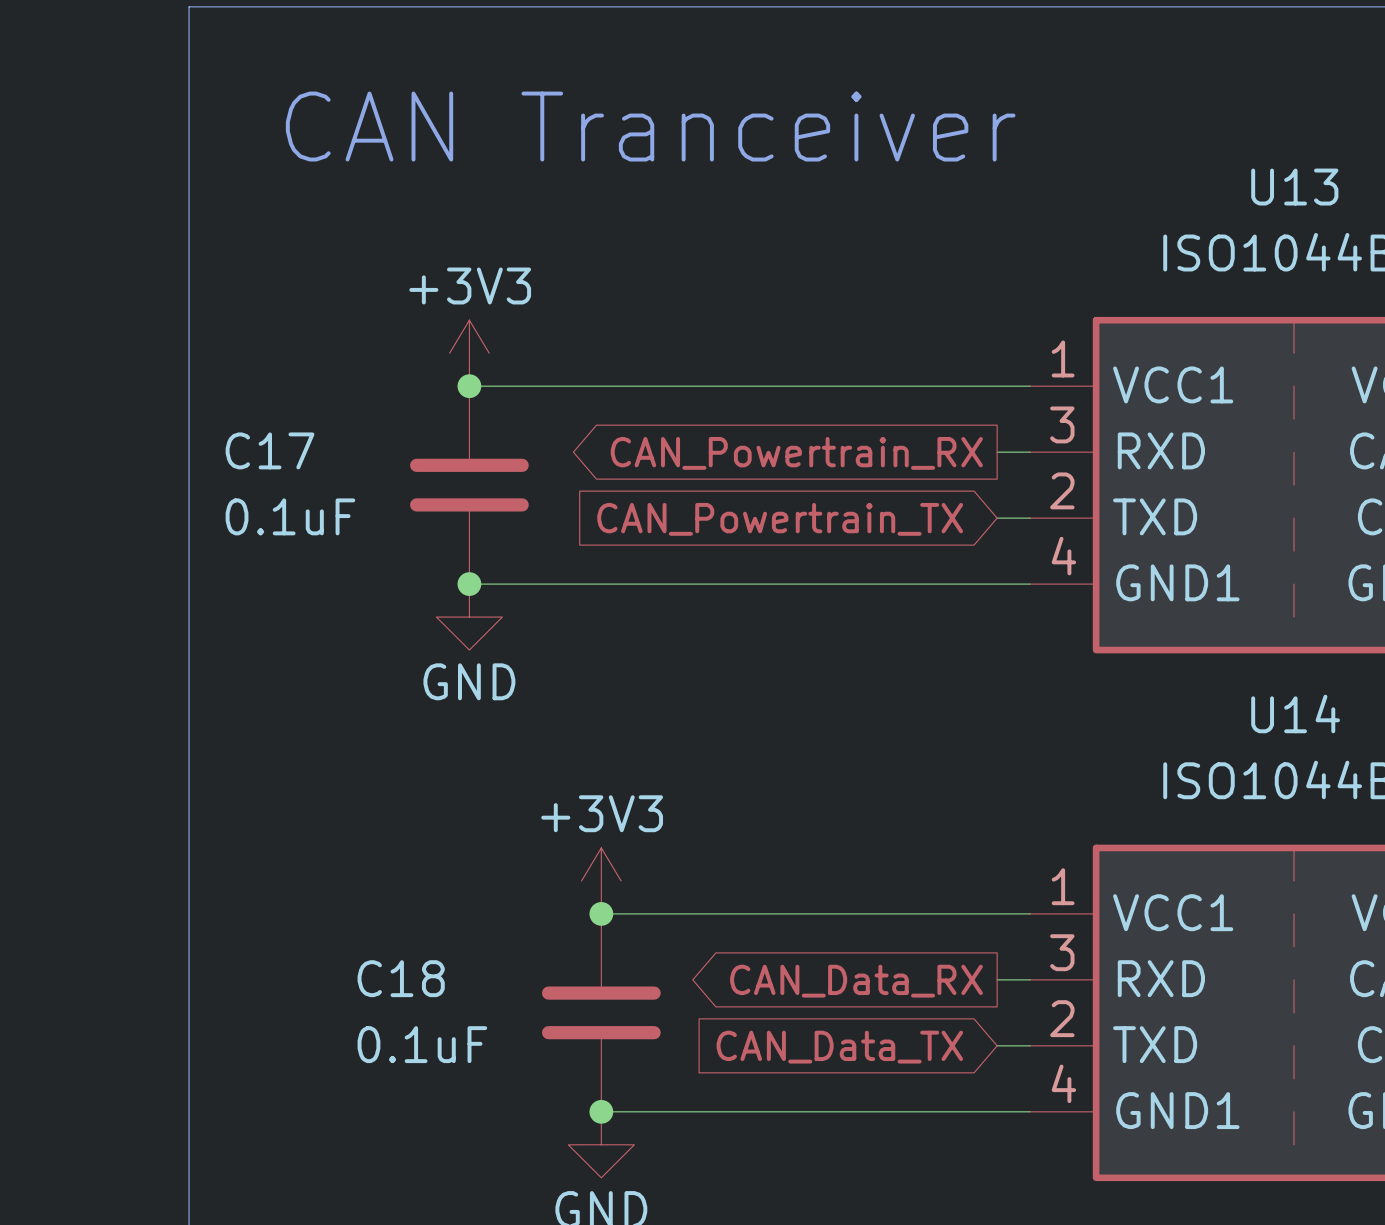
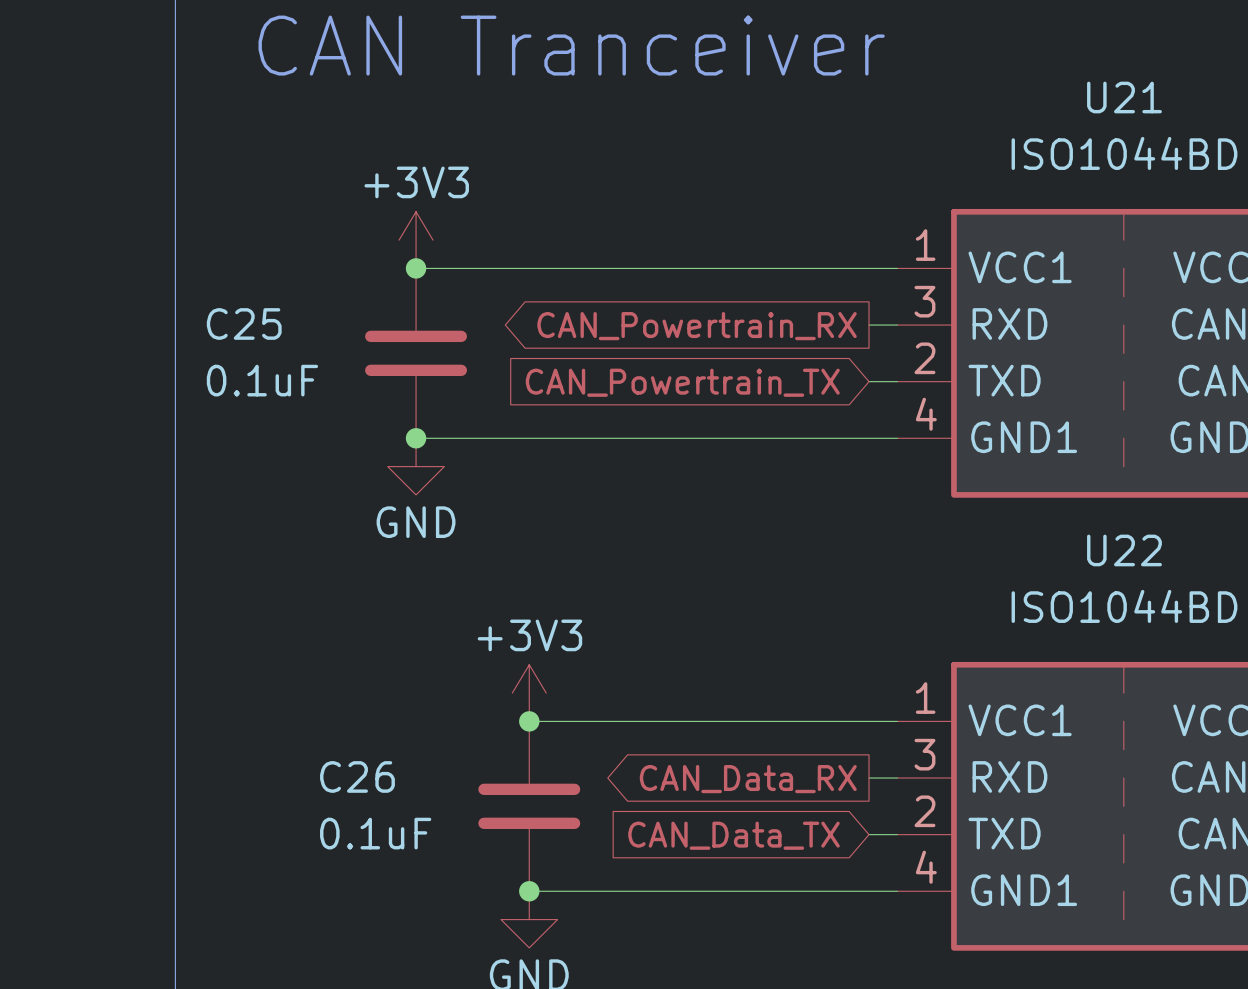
U13 name: U13 (1294, 187) -> U21 (1124, 97)
C17 name: C17 (270, 450) -> C25 (244, 323)
U14 name: U14 (1295, 714) -> U22 (1124, 550)
C18 name: C18 (401, 978) -> C26 (357, 776)

